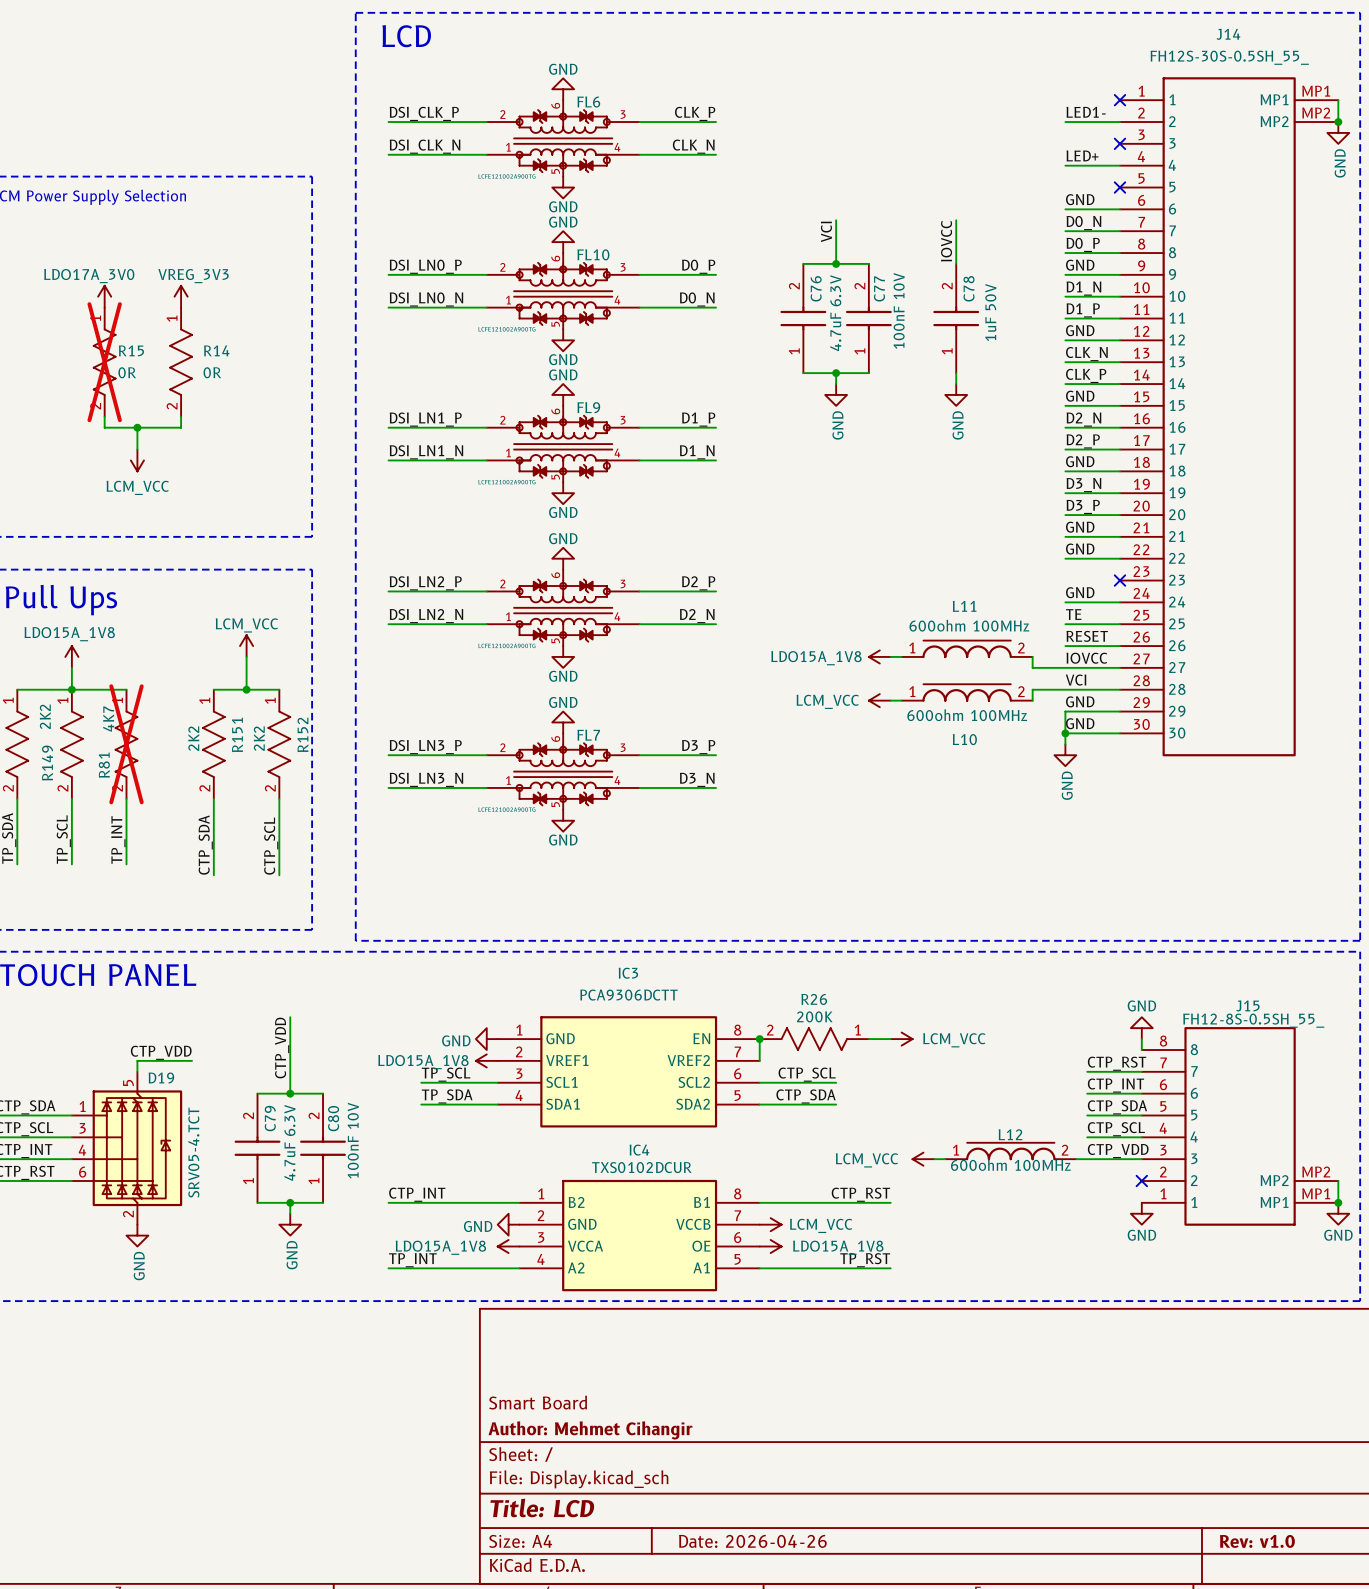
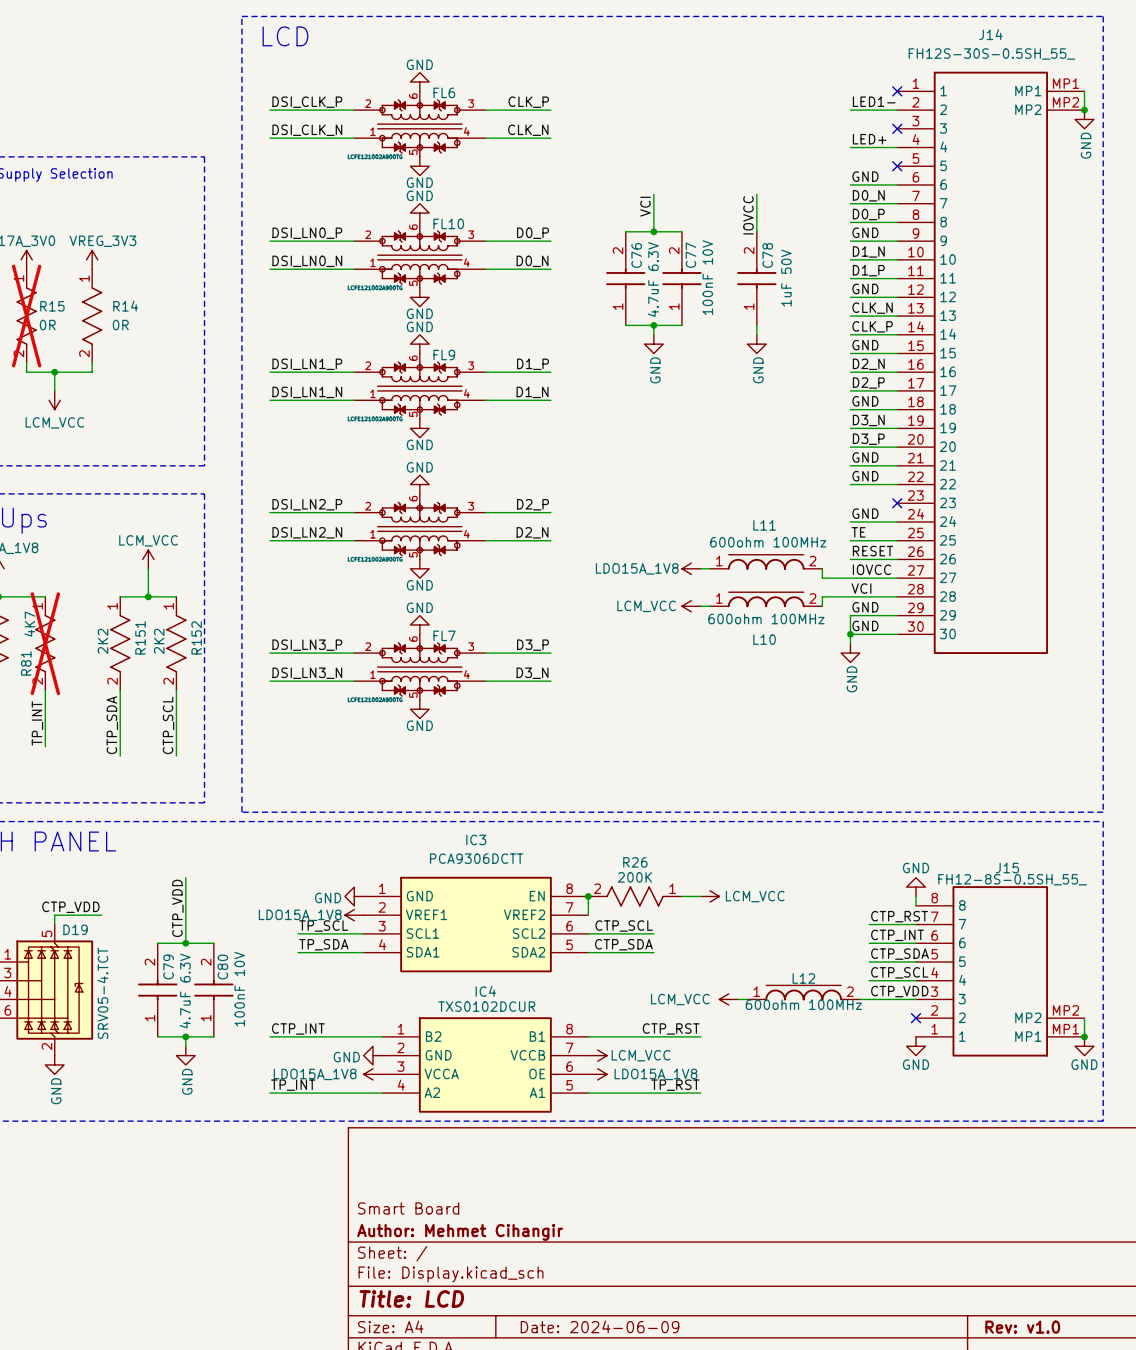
title block: Date: 2026-04-26 (752, 1541) -> Date: 2024-06-09 (600, 1326)

